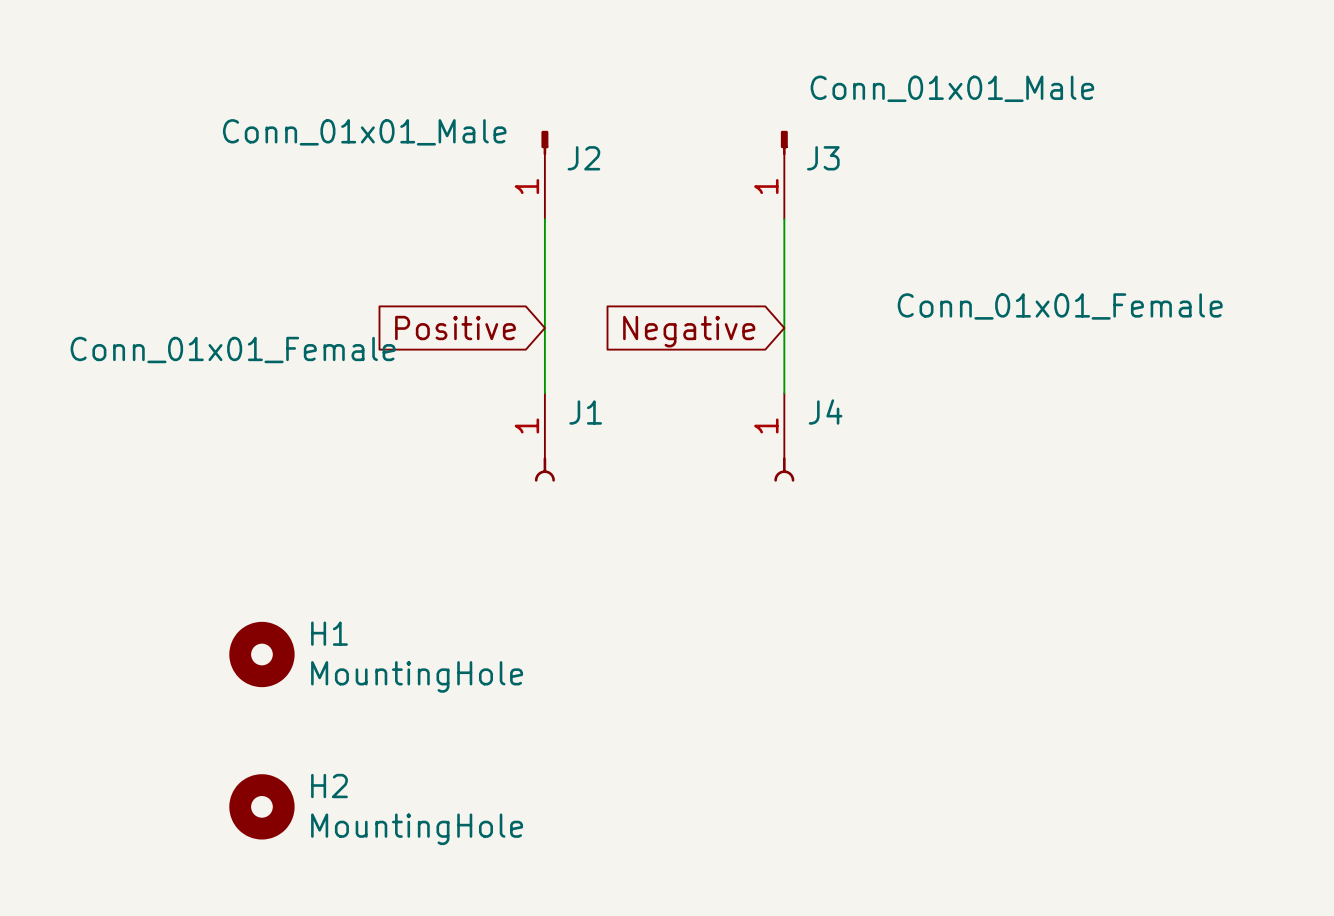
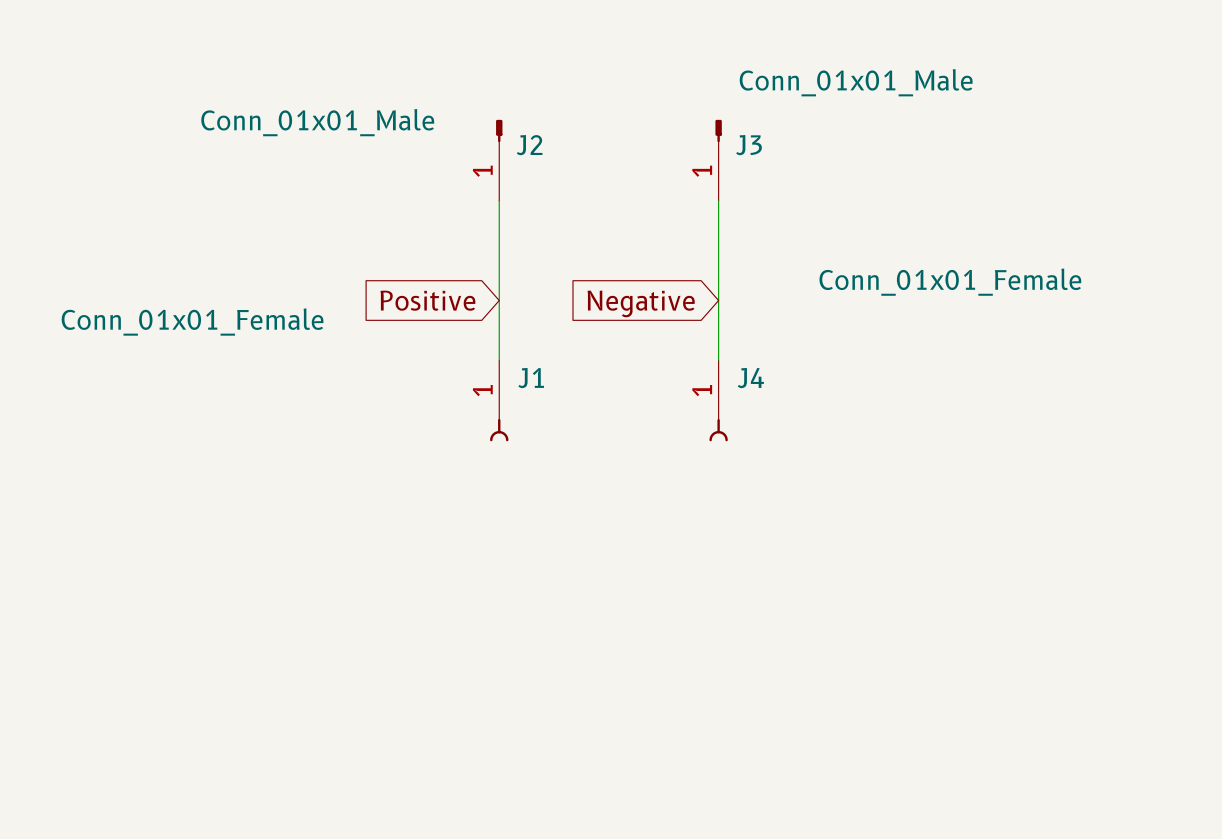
H1: MountingHole (261, 654) -> none
H2: MountingHole (261, 806) -> none

